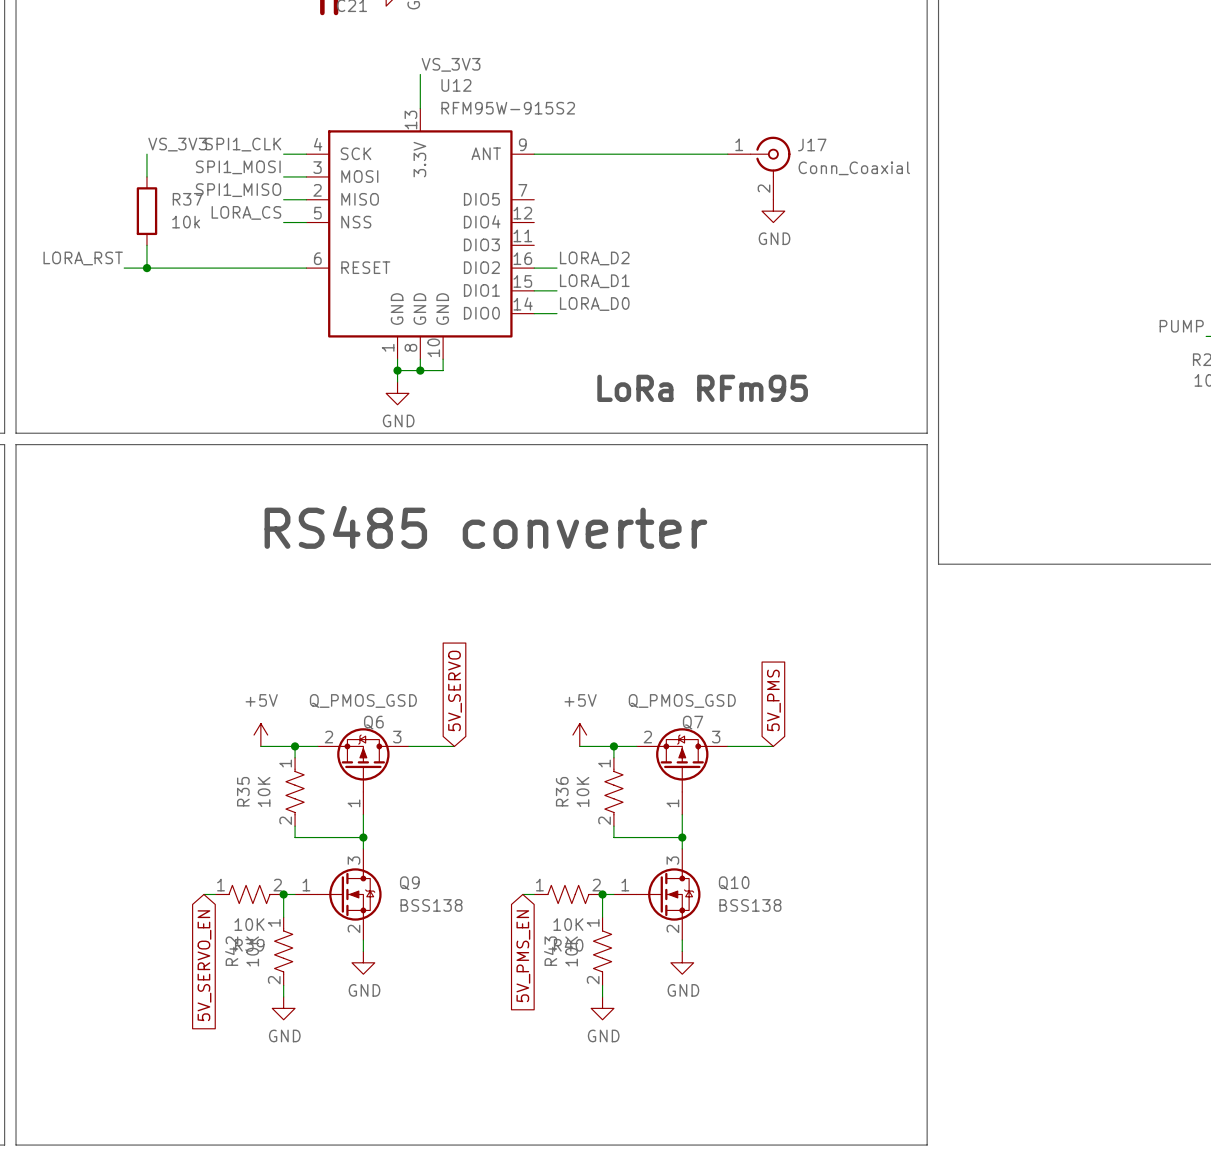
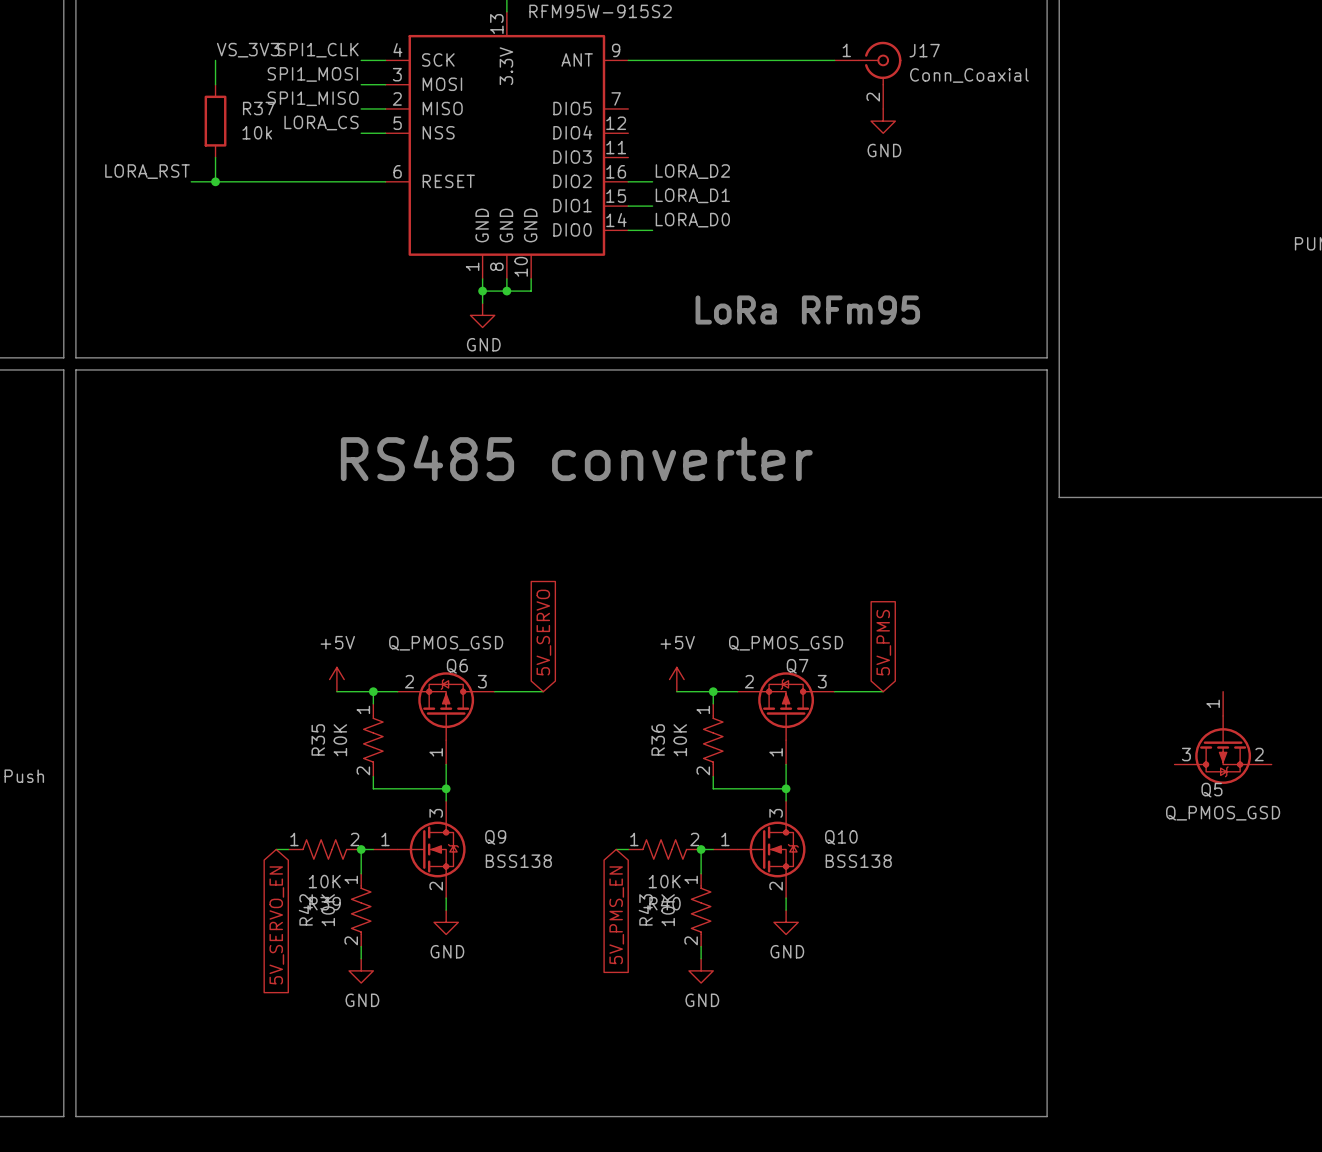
Q5: none -> Q_PMOS_GSD (1223, 737)

